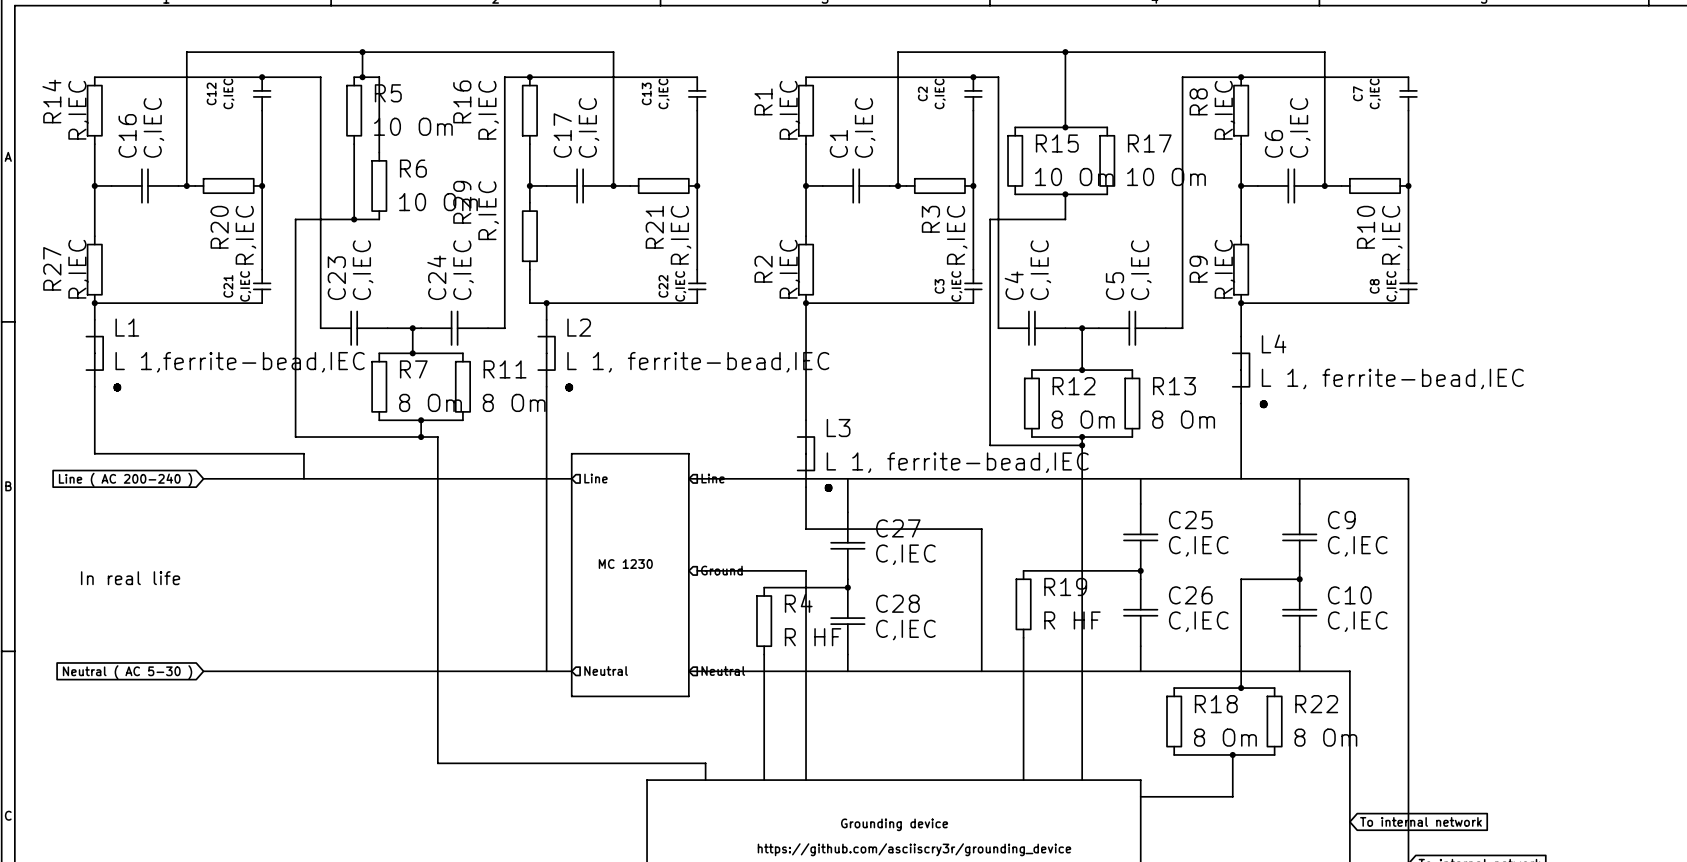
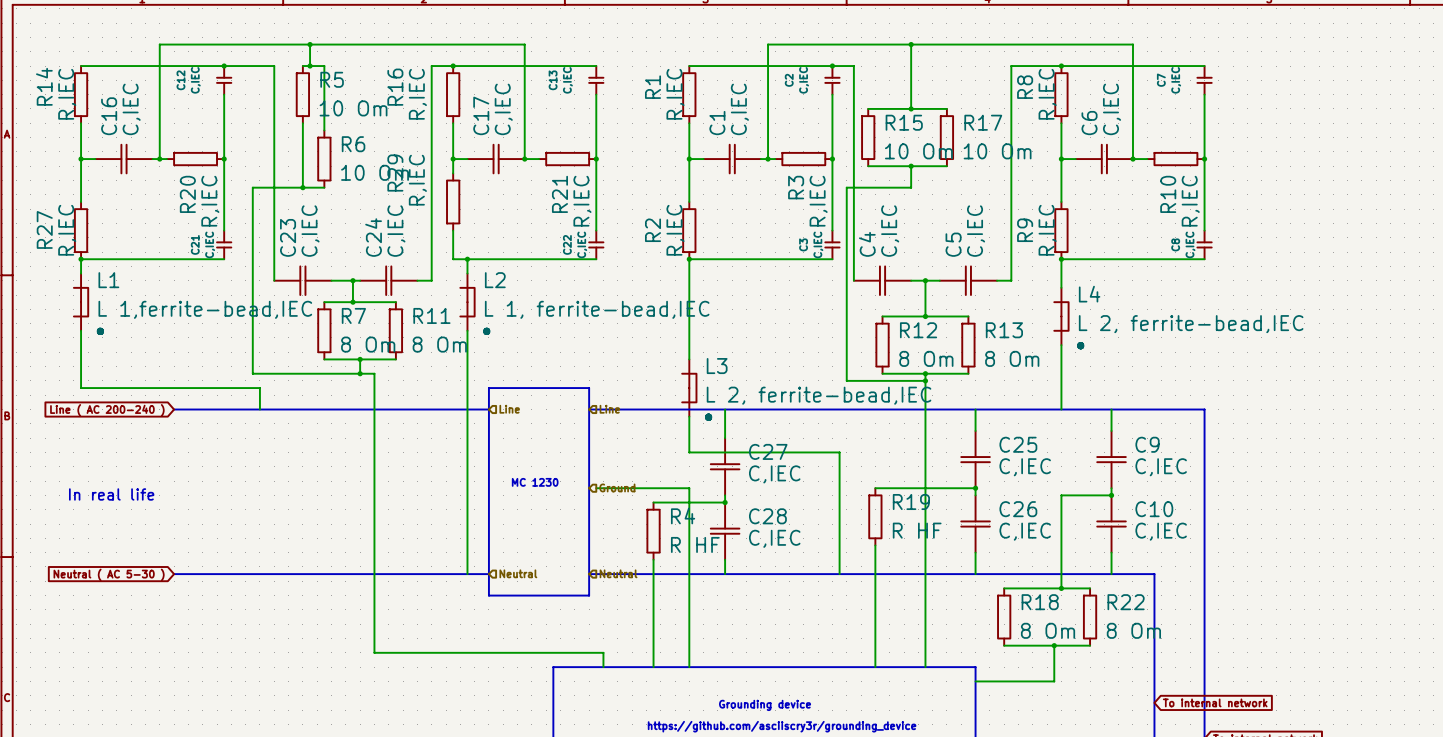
L4 value: L 1, ferrite-bead,IEC (1392, 379) -> L 2, ferrite-bead,IEC (1191, 324)
L3 value: L 1, ferrite-bead,IEC (957, 462) -> L 2, ferrite-bead,IEC (819, 395)

